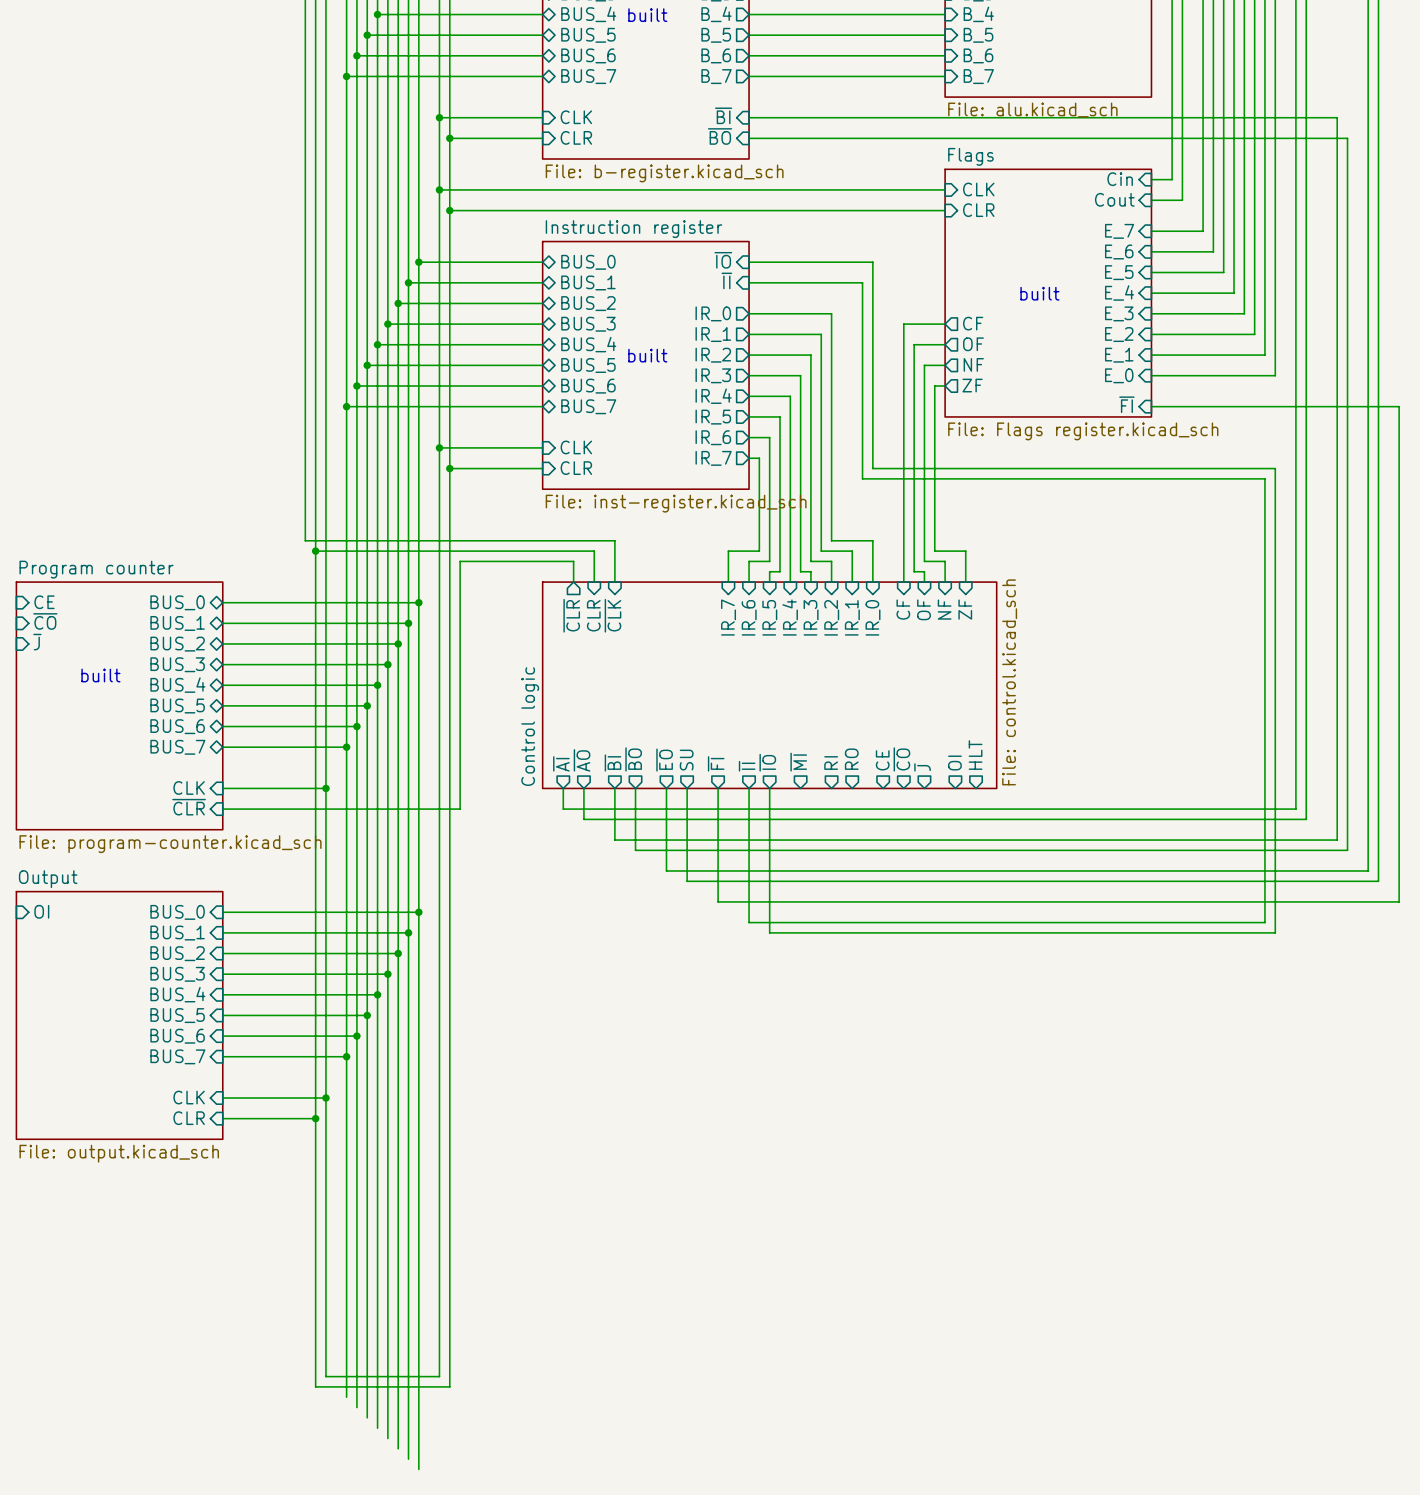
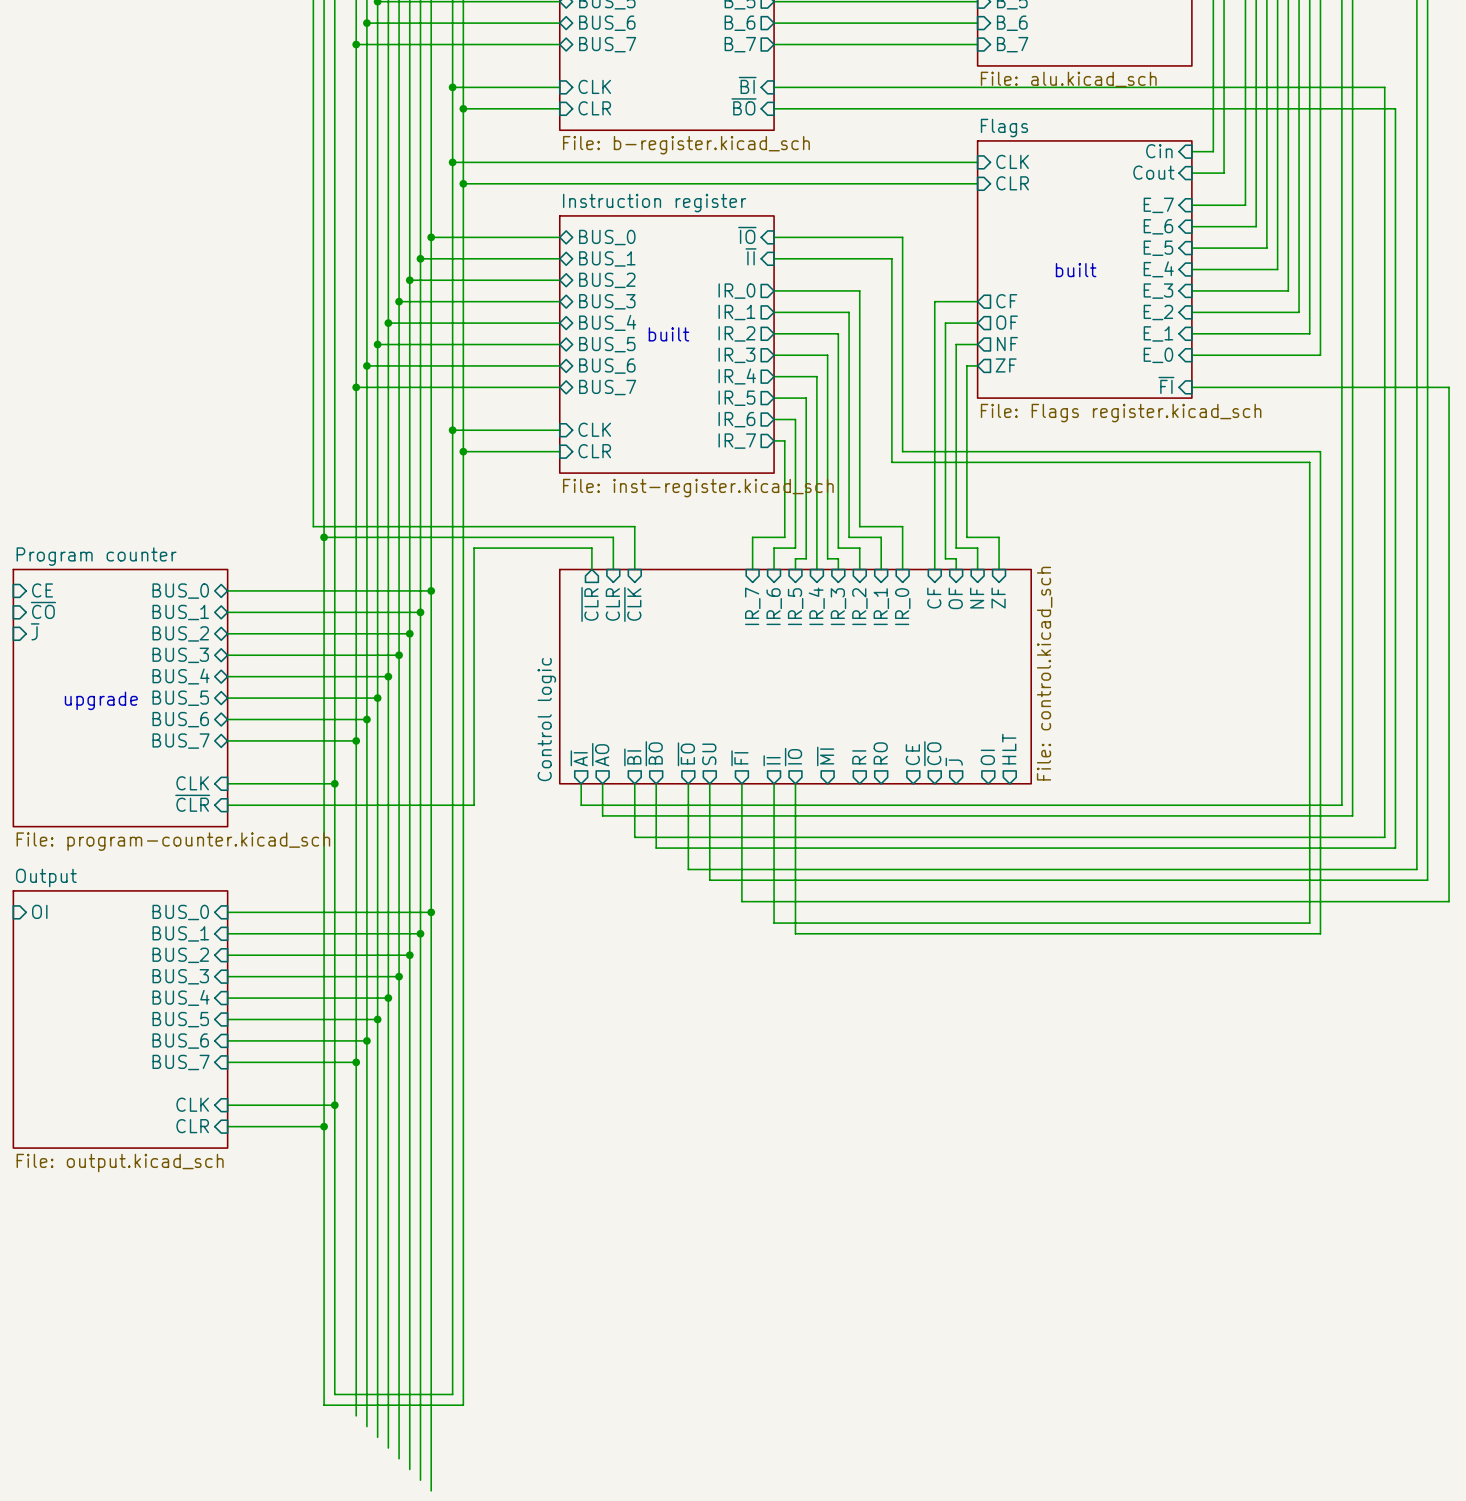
text: built (100, 675) -> none
text: none -> upgrade (101, 700)

